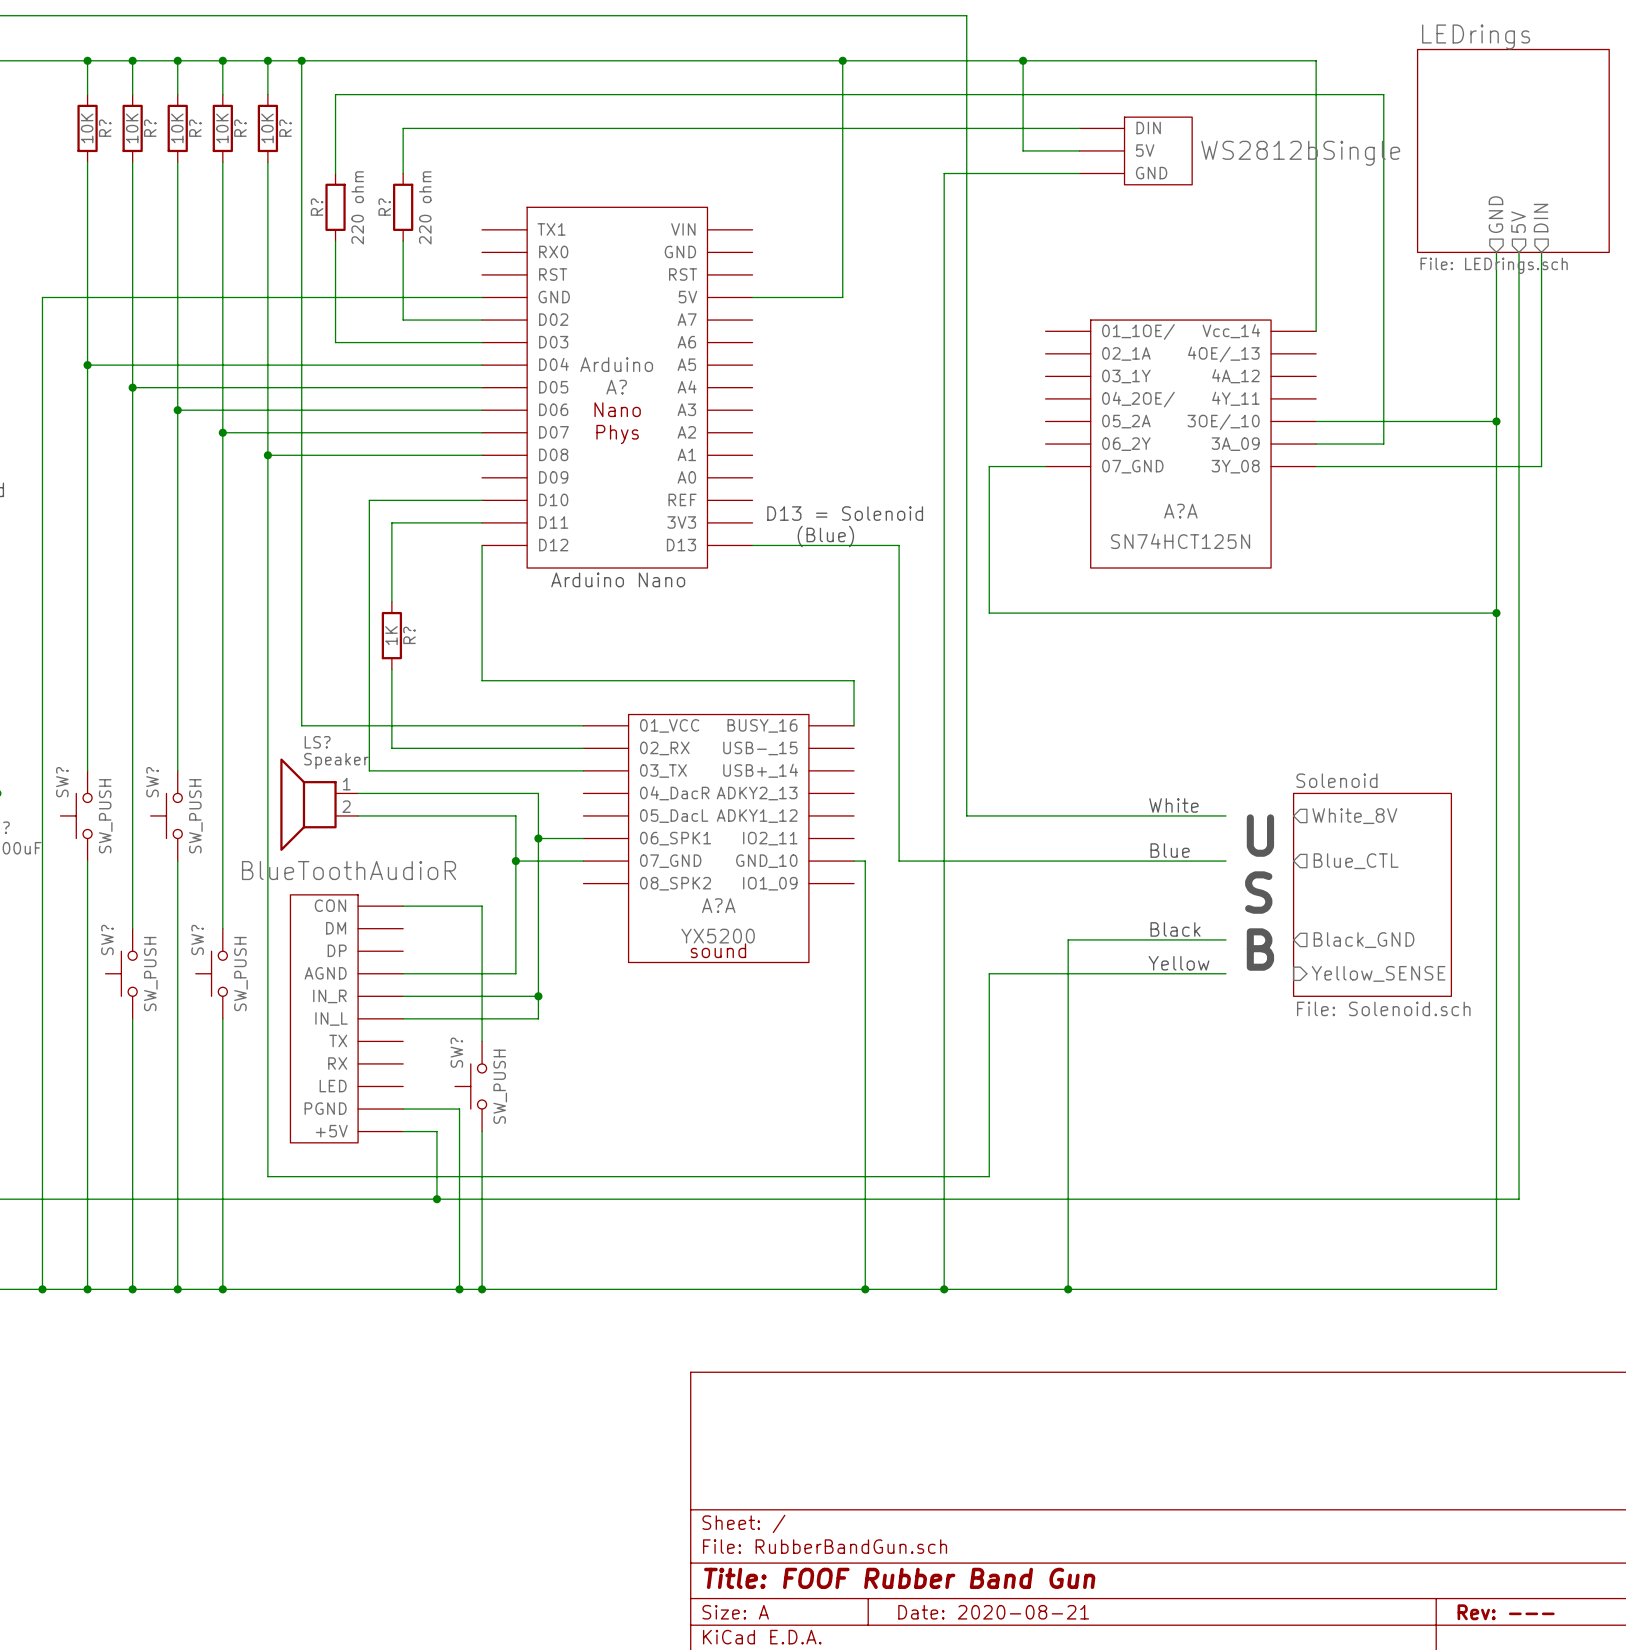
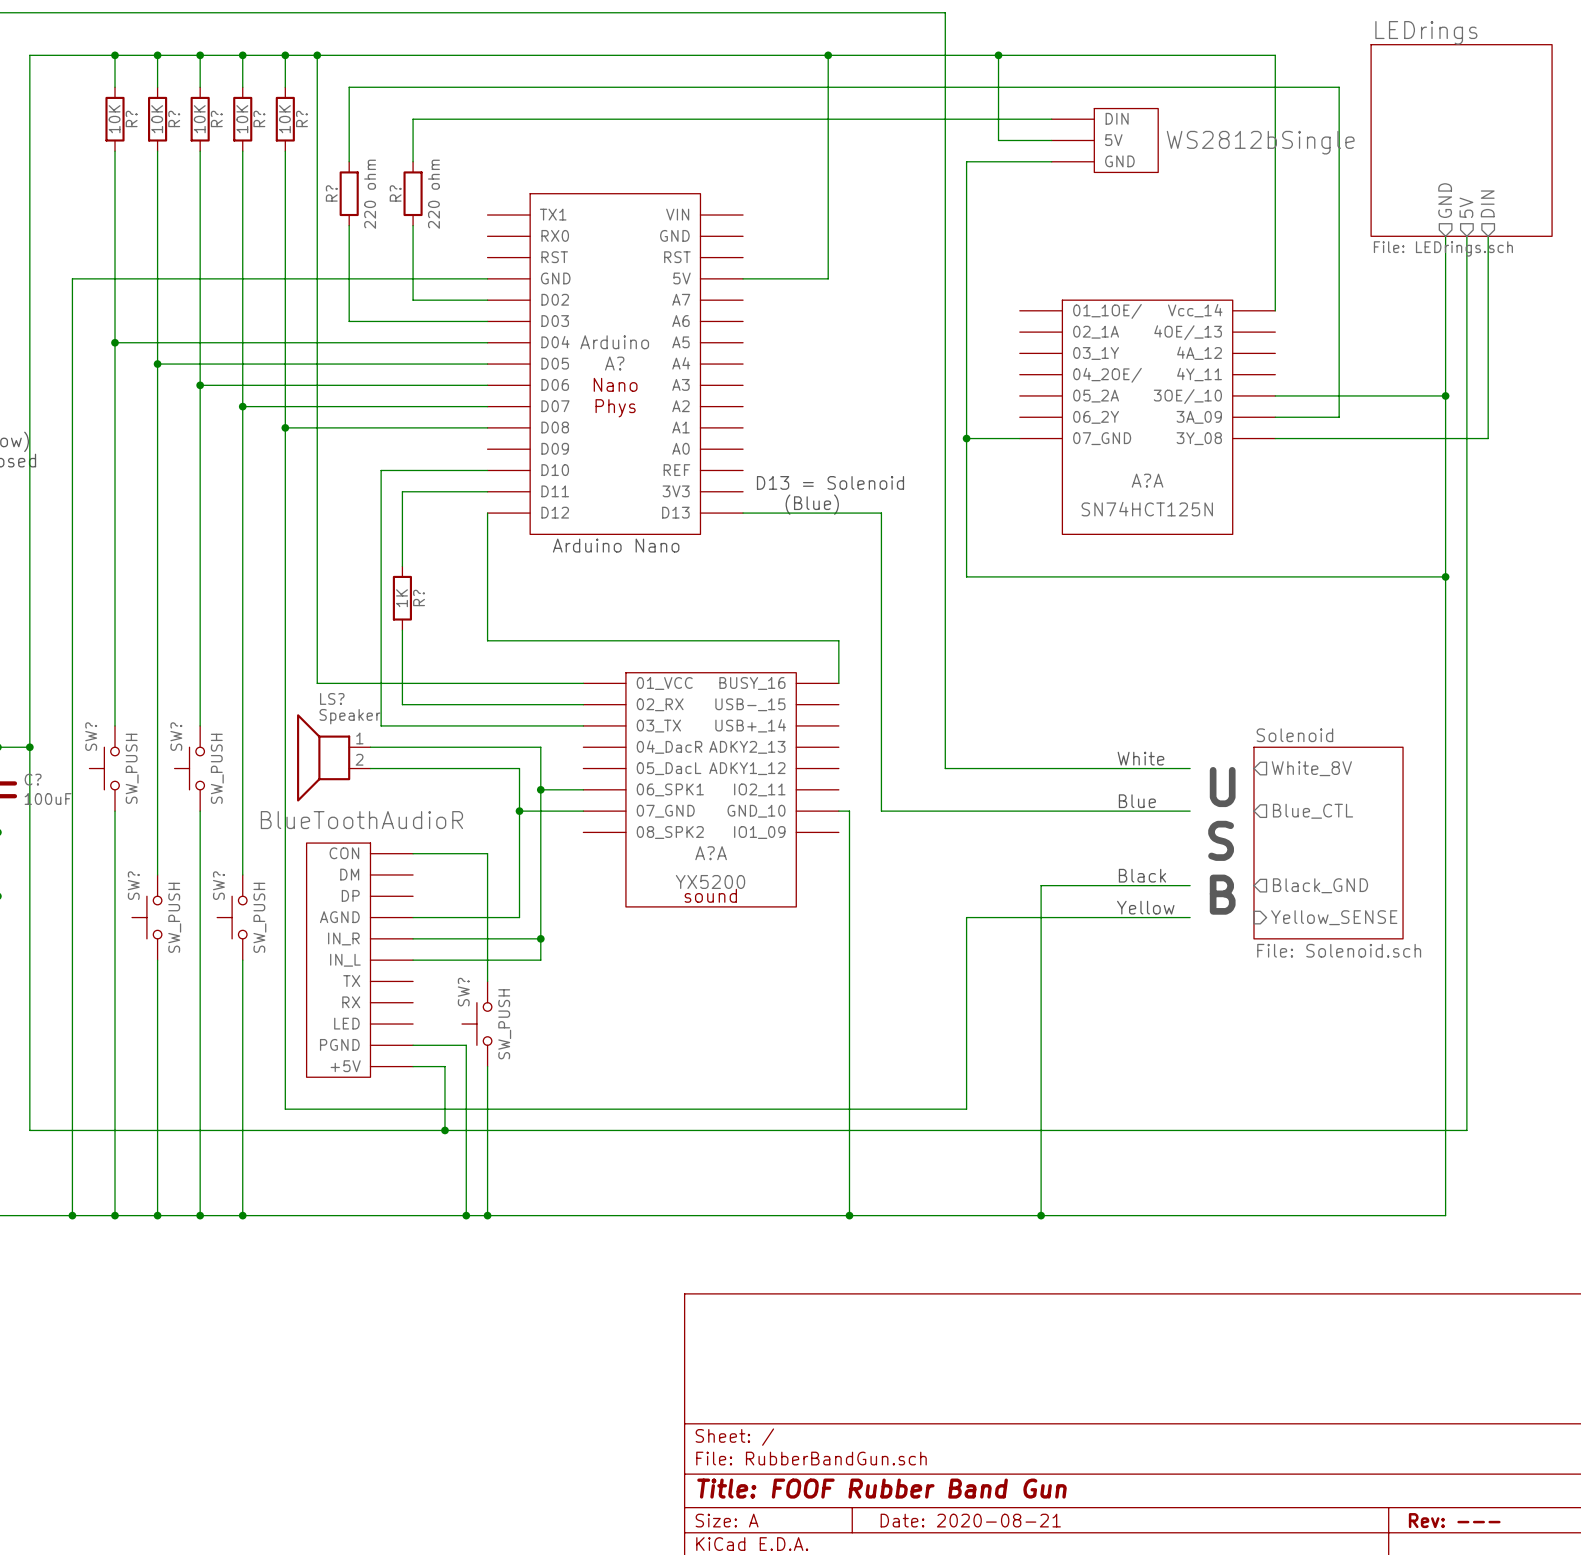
wire: (989, 173) (944, 173) (944, 1289) -> (966, 161) (966, 438)
junction: none -> (966, 438)
junction: (944, 1289) -> none

